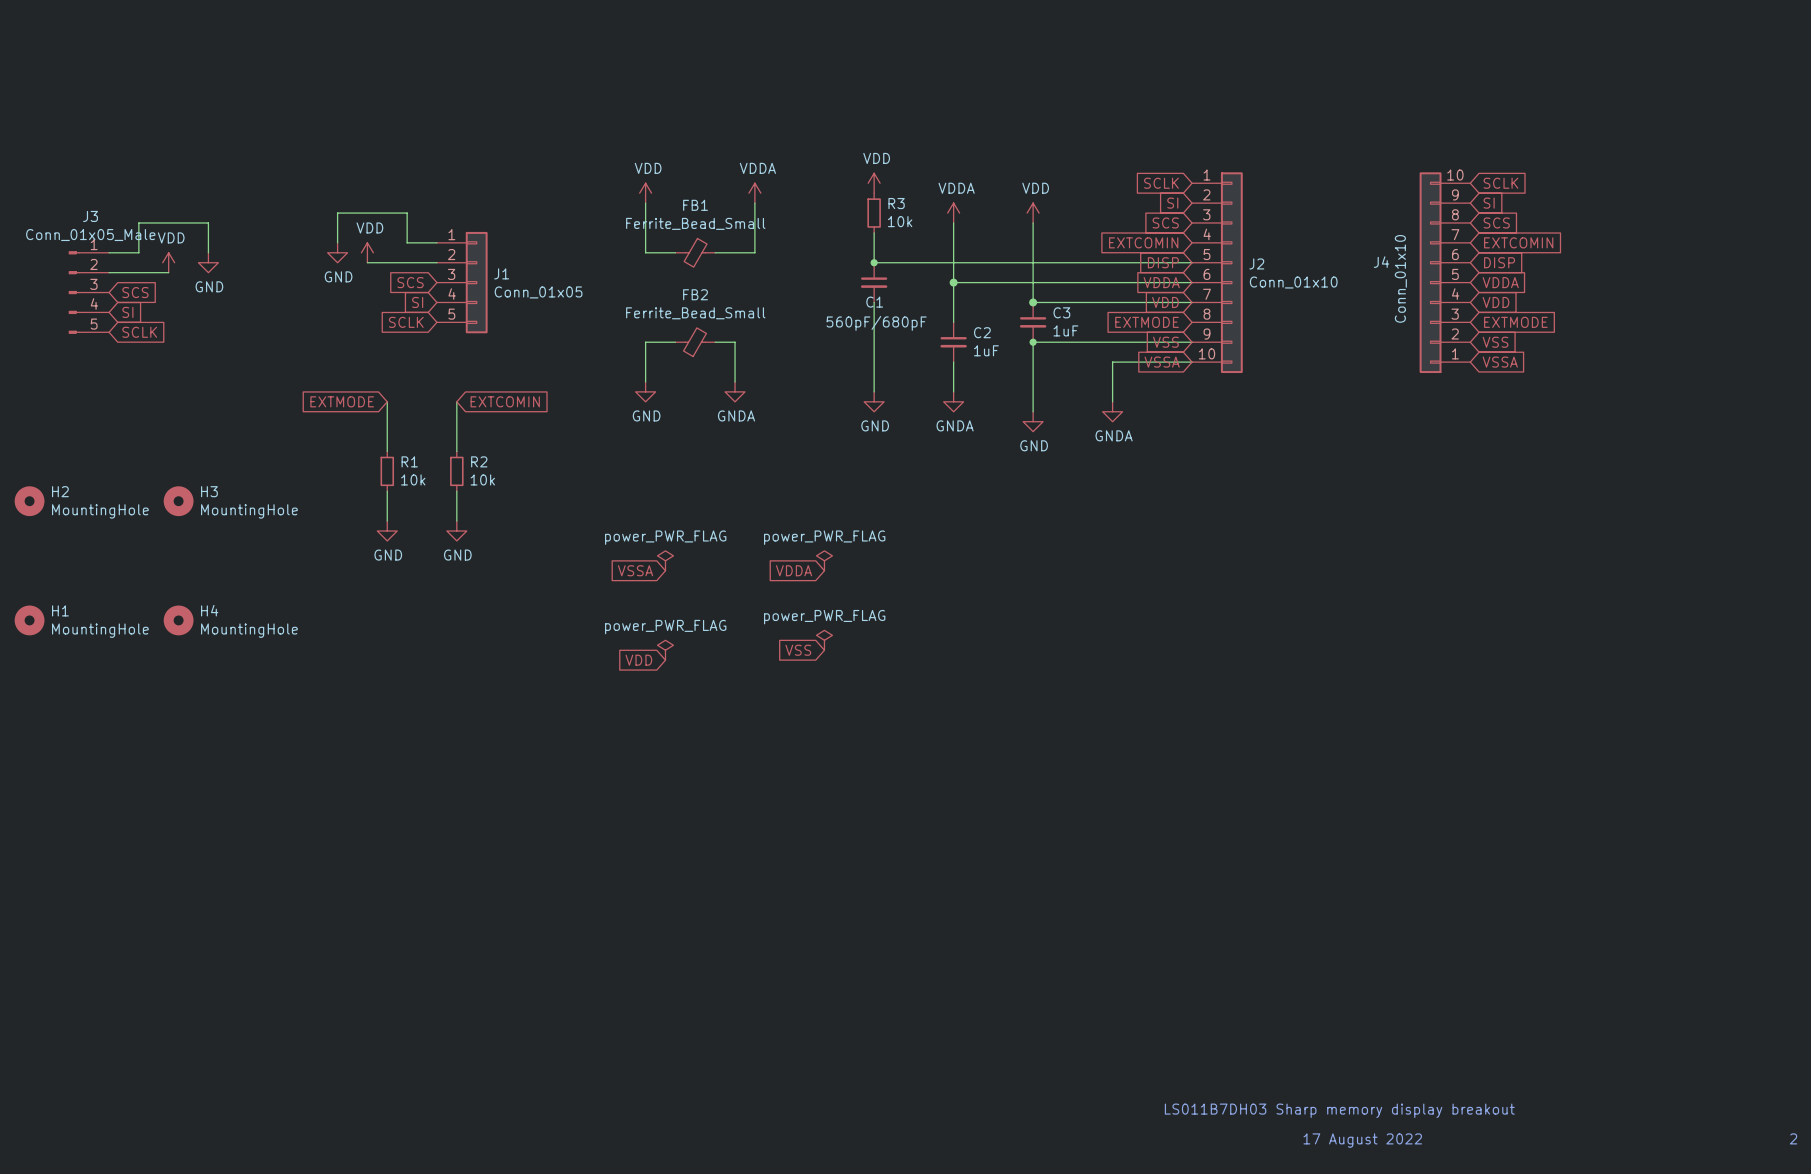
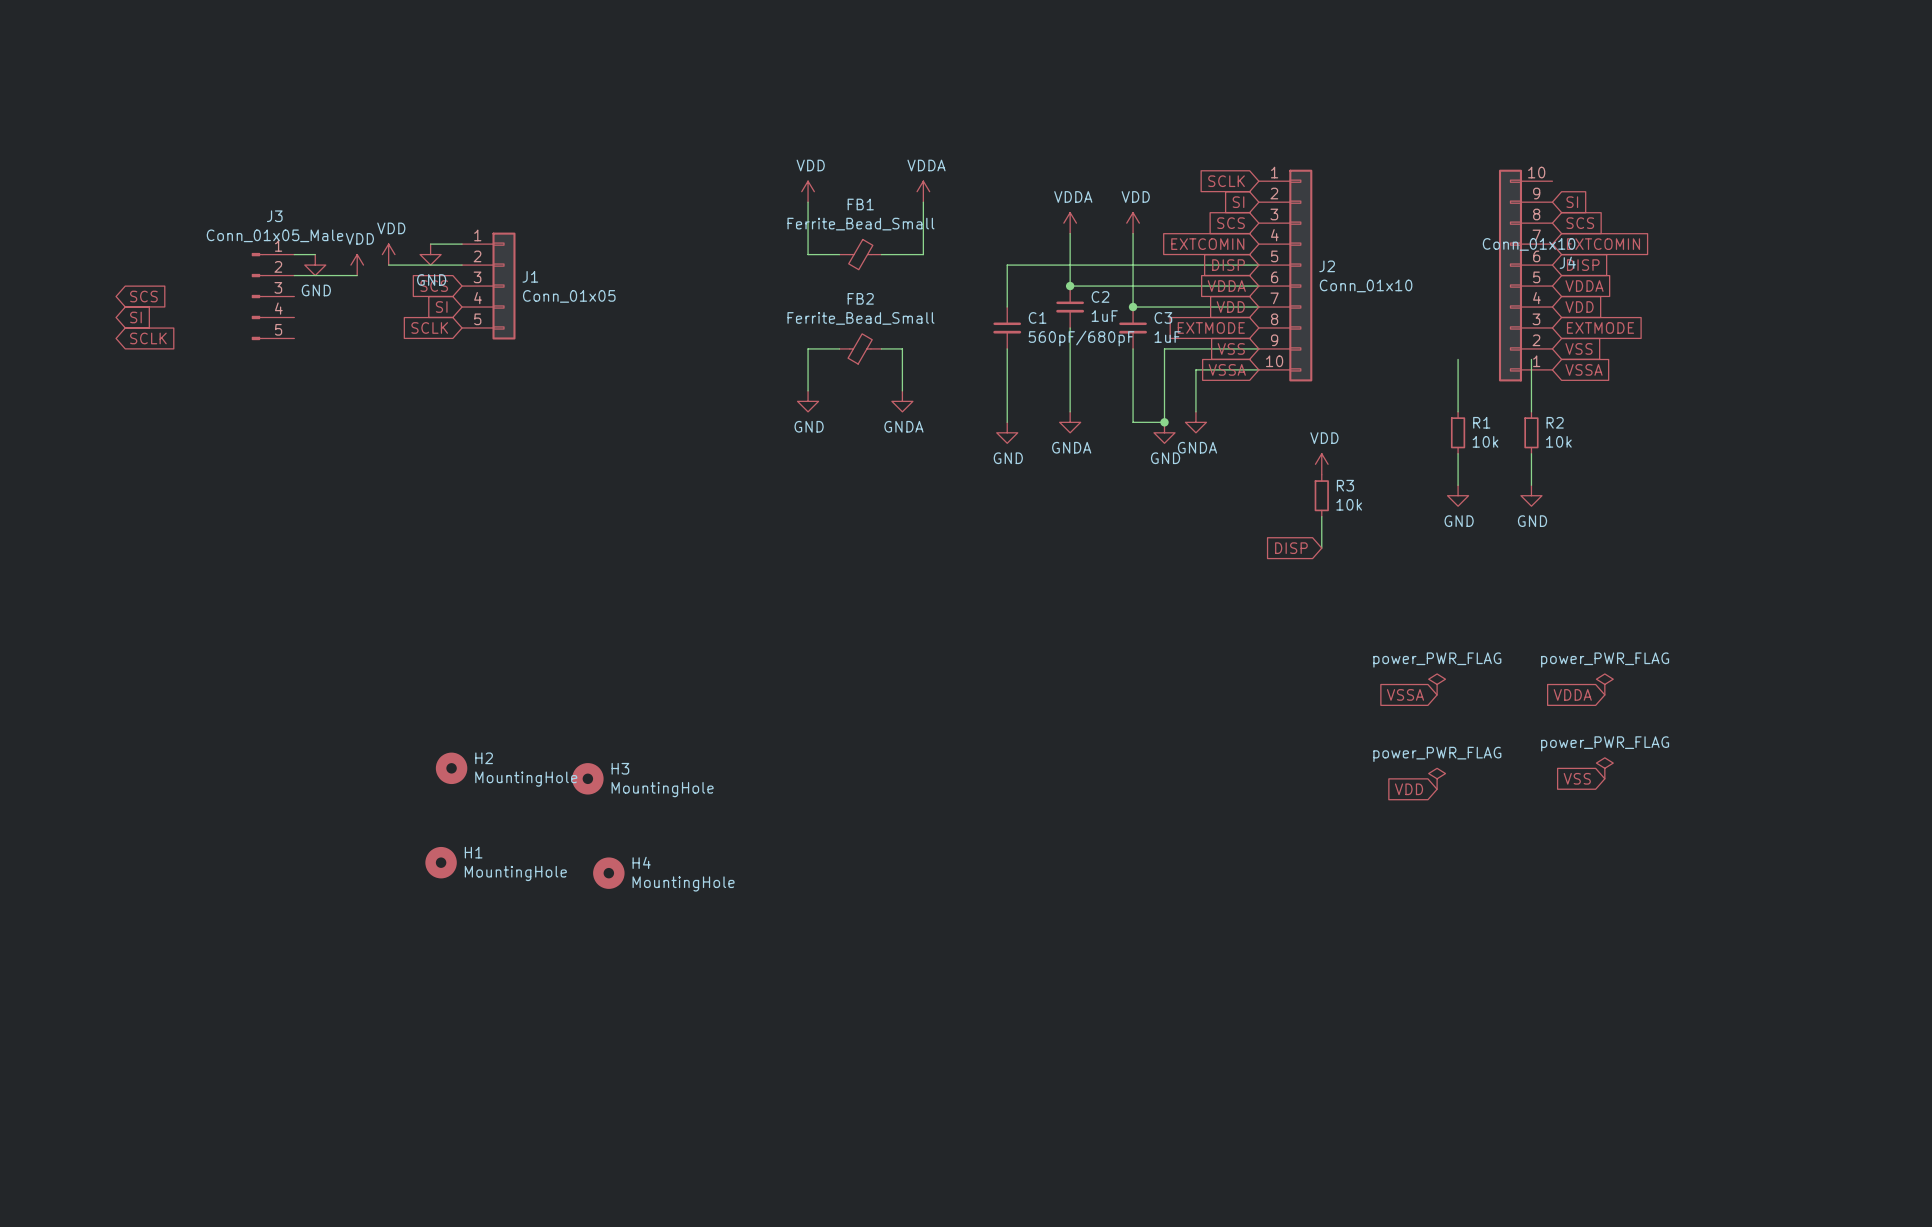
power symbol: VDD (874, 183) -> none
global label: SCLK (1500, 183) -> none
power symbol: VDD (645, 193) -> none
power symbol: VDDA (754, 193) -> none
power symbol: none -> VDD (808, 191)
power symbol: none -> VDDA (923, 191)
wire: (645, 203) (645, 252) (675, 252) -> (808, 202) (808, 254) (839, 254)
wire: (754, 203) (754, 252) (715, 252) -> none
wire: none -> (923, 202) (923, 233)
R3 position: (874, 213) -> (1321, 495)
power symbol: VDDA (953, 213) -> none
power symbol position: VDD (1033, 213) -> VDD (1133, 223)
wire: (953, 222) (953, 262) (874, 262) (874, 252) -> (881, 254) (923, 254)
power symbol: none -> VDDA (1070, 223)
wire: (1033, 222) (1033, 302) (1072, 302) -> (1133, 233) (1133, 307)
wire: (337, 242) (337, 213) (407, 213) (407, 242) -> none
wire: (109, 252) (138, 252) (138, 222) (208, 222) (208, 252) -> none
wire: none -> (294, 254) (315, 254)
power symbol: GND (337, 252) -> none
power symbol: none -> GND (430, 254)
FB1 position: (695, 252) -> (860, 254)
power symbol: VDD (168, 262) -> none
power symbol: GND (208, 262) -> none
power symbol: none -> GND (315, 265)
power symbol: none -> VDD (357, 265)
junction: (874, 262) -> none
J4 name position: J4 (1381, 262) -> J4 (1567, 262)
wire: (109, 272) (168, 272) -> (294, 275) (357, 275)
J4 value rotation: 0° (1400, 278) -> 90° clockwise (1529, 244)
C1 position: (874, 282) -> (1007, 327)
wire: (953, 282) (1013, 282) -> (1070, 233) (1070, 286)
junction: (953, 282) -> none
junction: none -> (1070, 286)
J3 position: (88, 292) -> (273, 296)
wire: (874, 302) (874, 391) -> none
C1 name position: C1 (874, 302) -> C1 (1037, 317)
junction: (1033, 302) -> none
junction: none -> (1133, 307)
wire: none -> (1070, 327) (1070, 411)
C3 position: (1033, 322) -> (1133, 327)
C1 value position: 560pF/680pF (876, 323) -> 560pF/680pF (1081, 338)
wire: (675, 342) (645, 342) (645, 381) -> (839, 348) (808, 348) (808, 390)
FB2 position: (695, 342) -> (860, 348)
wire: (715, 342) (735, 342) (735, 381) -> (881, 348) (902, 348) (902, 390)
C2 position: (953, 342) -> (1070, 307)
junction: (1033, 342) -> none
wire: (1102, 342) (1033, 342) (1033, 411) -> (1164, 348) (1164, 422) (1133, 422) (1133, 348)
wire: none -> (1458, 359) (1458, 411)
wire: none -> (1531, 359) (1531, 411)
wire: (1132, 362) (1112, 362) (1112, 401) -> (1195, 369) (1195, 411)
power symbol: GND (645, 391) -> none
power symbol: GNDA (735, 391) -> none
power symbol: none -> GND (808, 401)
power symbol: none -> GNDA (902, 401)
global label: EXTMODE (342, 401) -> none
wire: (387, 401) (387, 451) -> none
wire: (456, 401) (456, 451) -> none
global label: EXTCOMIN (505, 401) -> none
power symbol: GND (874, 401) -> none
power symbol: GNDA (953, 401) -> none
power symbol: none -> GNDA (1070, 422)
junction: none -> (1164, 422)
power symbol position: GNDA (1112, 411) -> GNDA (1195, 422)
power symbol: none -> GND (1007, 432)
power symbol: GND (1033, 421) -> none
power symbol: none -> GND (1164, 432)
wire: none -> (1458, 453) (1458, 485)
wire: none -> (1531, 453) (1531, 485)
power symbol: none -> VDD (1321, 464)
R1 position: (387, 471) -> (1458, 432)
R2 position: (456, 471) -> (1531, 432)
power symbol: none -> GND (1458, 495)
power symbol: none -> GND (1531, 495)
wire: (387, 491) (387, 521) -> none
wire: (456, 491) (456, 521) -> none
H2 position: (29, 501) -> (451, 768)
H3 position: (178, 501) -> (587, 778)
wire: none -> (1321, 516) (1321, 548)
power symbol: GND (387, 531) -> none
power symbol: GND (456, 531) -> none
global label: none -> DISP (1291, 548)
power symbol: power_PWR_FLAG (665, 560) -> none
power symbol: power_PWR_FLAG (824, 560) -> none
global label: VSSA (635, 570) -> none
global label: VDDA (794, 570) -> none
H1 position: (29, 620) -> (441, 862)
H4 position: (178, 620) -> (608, 873)
power symbol: power_PWR_FLAG (824, 640) -> none
power symbol: power_PWR_FLAG (665, 650) -> none
global label: VSS (798, 650) -> none
global label: VDD (638, 660) -> none
power symbol: none -> power_PWR_FLAG (1437, 684)
power symbol: none -> power_PWR_FLAG (1604, 684)
global label: none -> VSSA (1405, 694)
global label: none -> VDDA (1572, 694)
power symbol: none -> power_PWR_FLAG (1604, 768)
power symbol: none -> power_PWR_FLAG (1437, 778)
global label: none -> VSS (1577, 778)
global label: none -> VDD (1409, 789)
text: LS011B7DH03 Sharp memory display breakout (1339, 1110) -> none
text: 2 (1793, 1138) -> none
text: 17 August 2022 (1362, 1140) -> none

